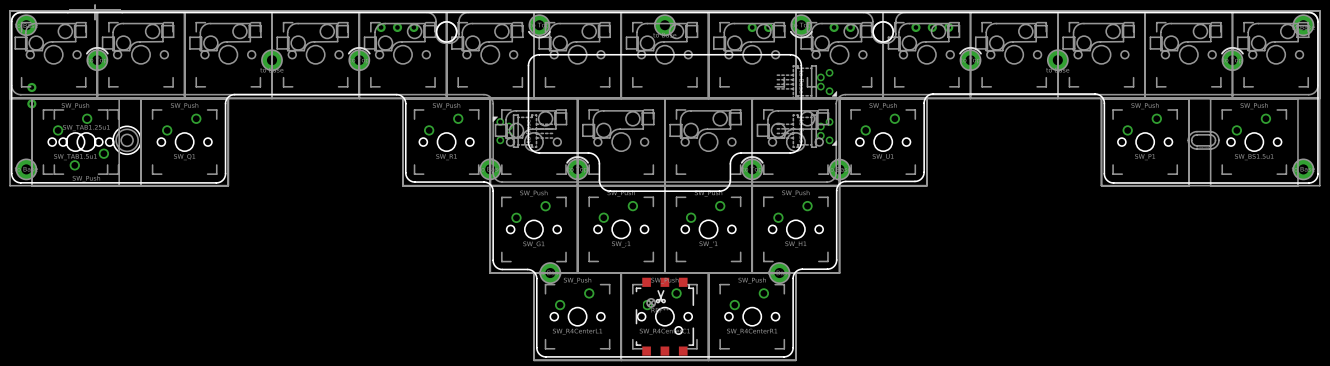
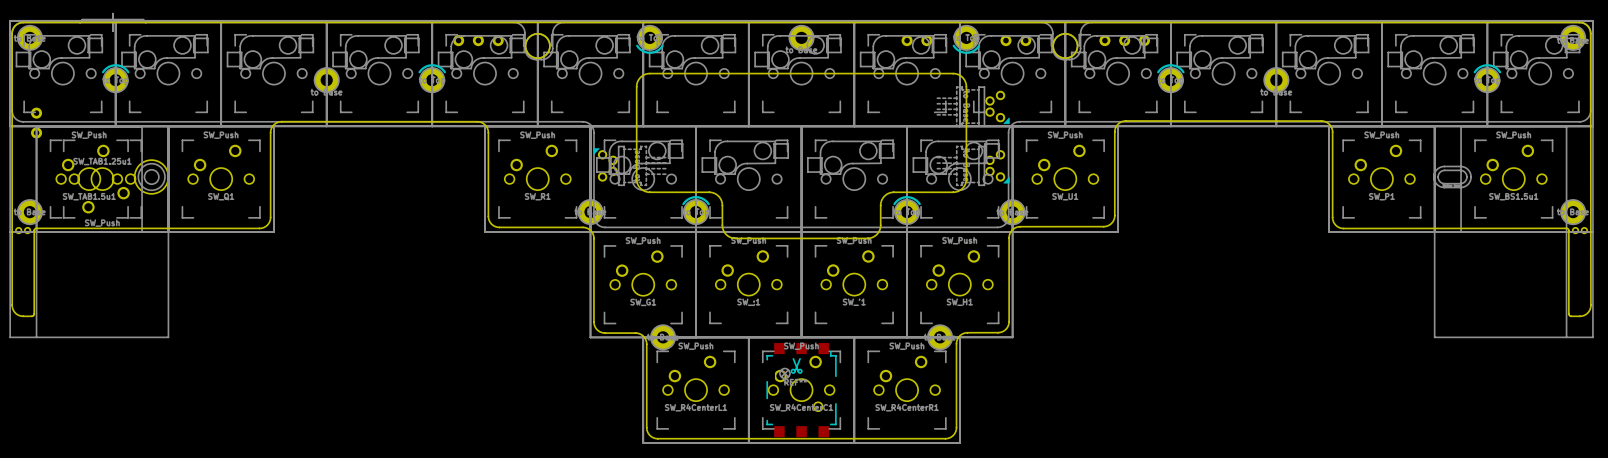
part footprint: [9, 4, 1321, 361] -> [9, 13, 1594, 444]

